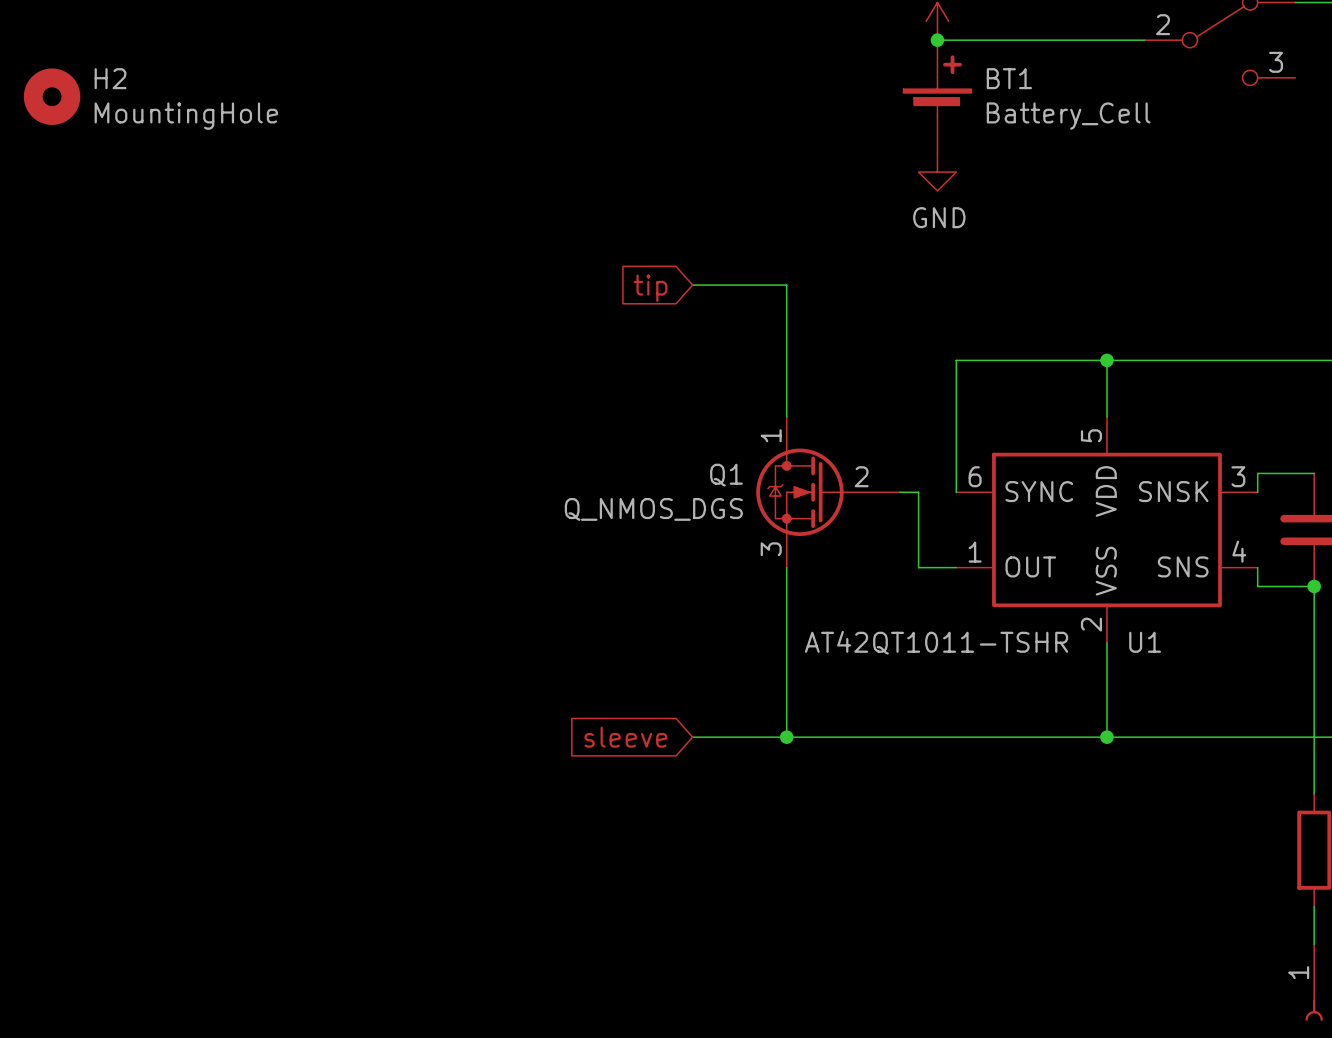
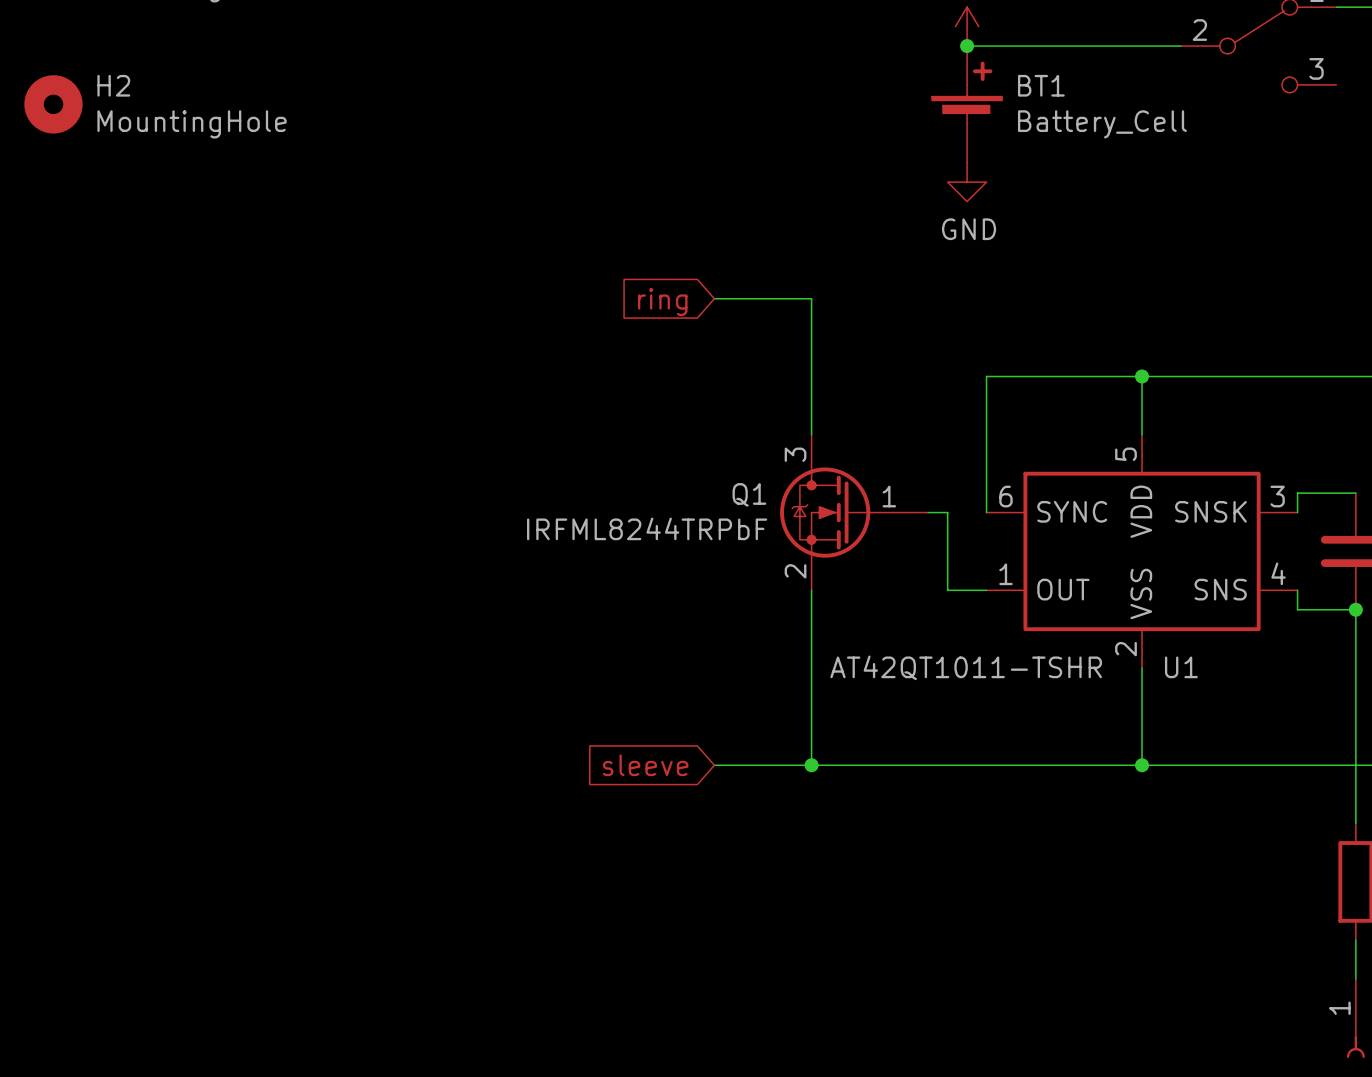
global label: tip (650, 288) -> ring (662, 301)
Q1 pin number: 1 (771, 435) -> 3 (795, 454)
Q1 pin number: 2 (861, 476) -> 1 (889, 496)
Q1 value: Q_NMOS_DGS (653, 509) -> IRFML8244TRPbF (647, 528)
Q1 pin number: 3 (771, 549) -> 2 (795, 571)

